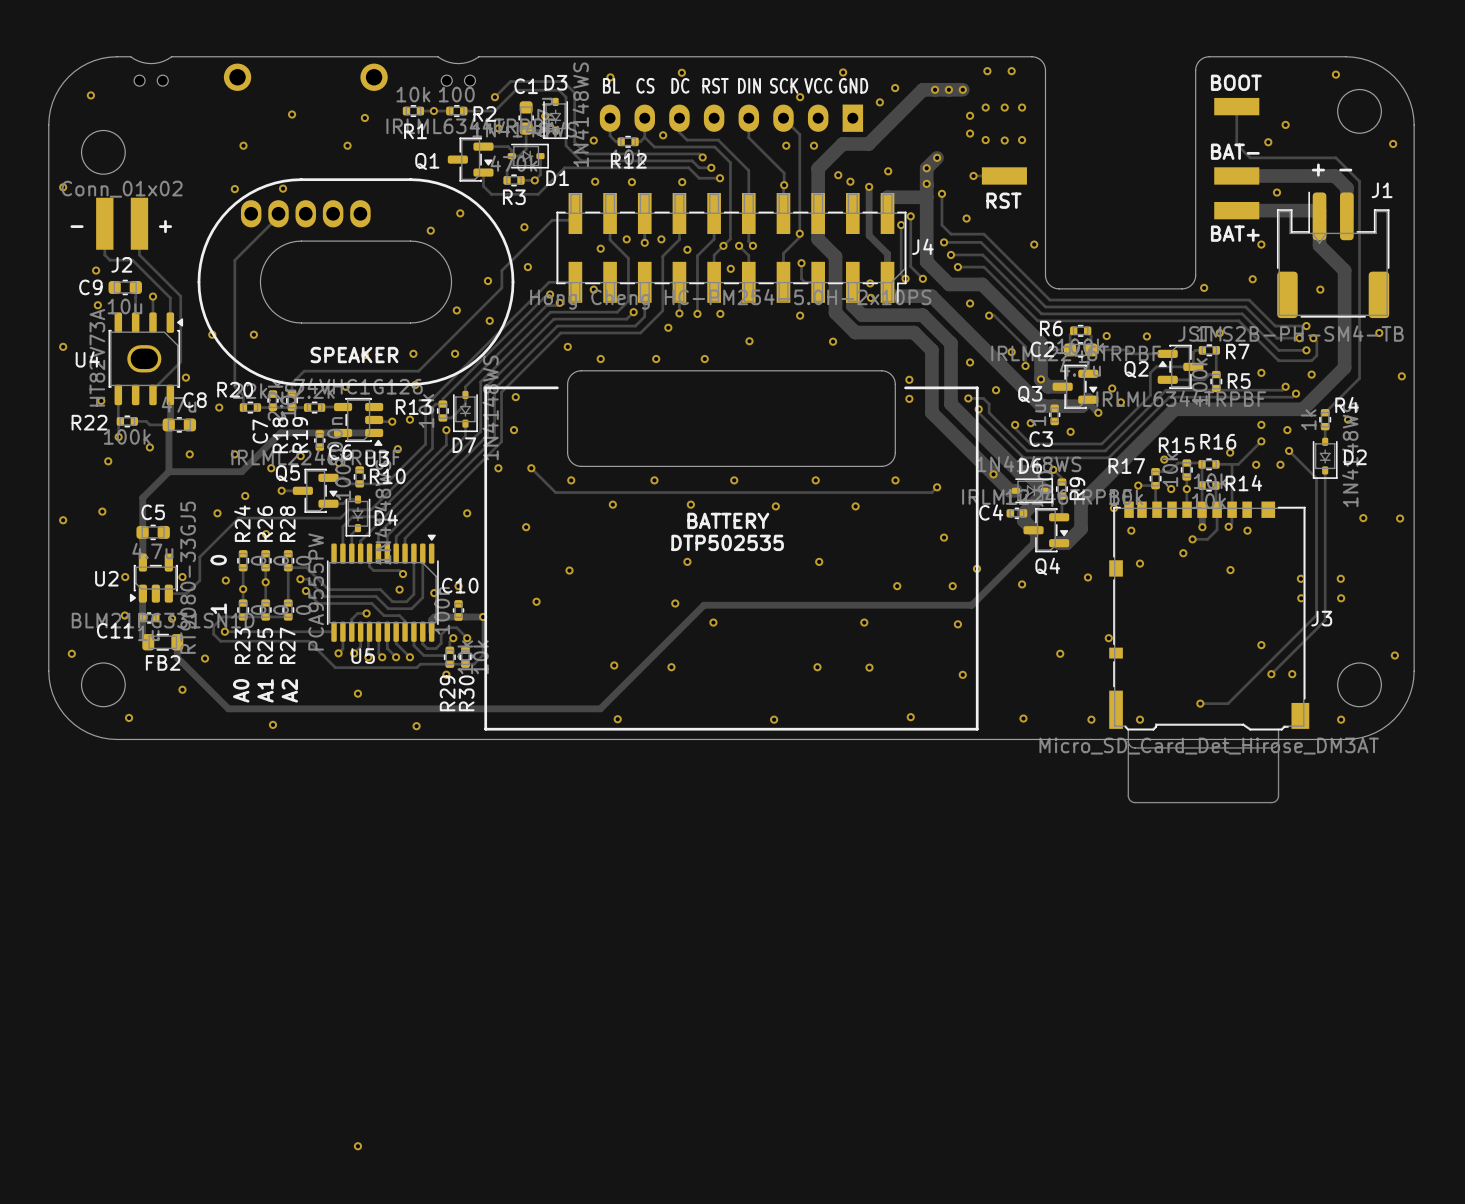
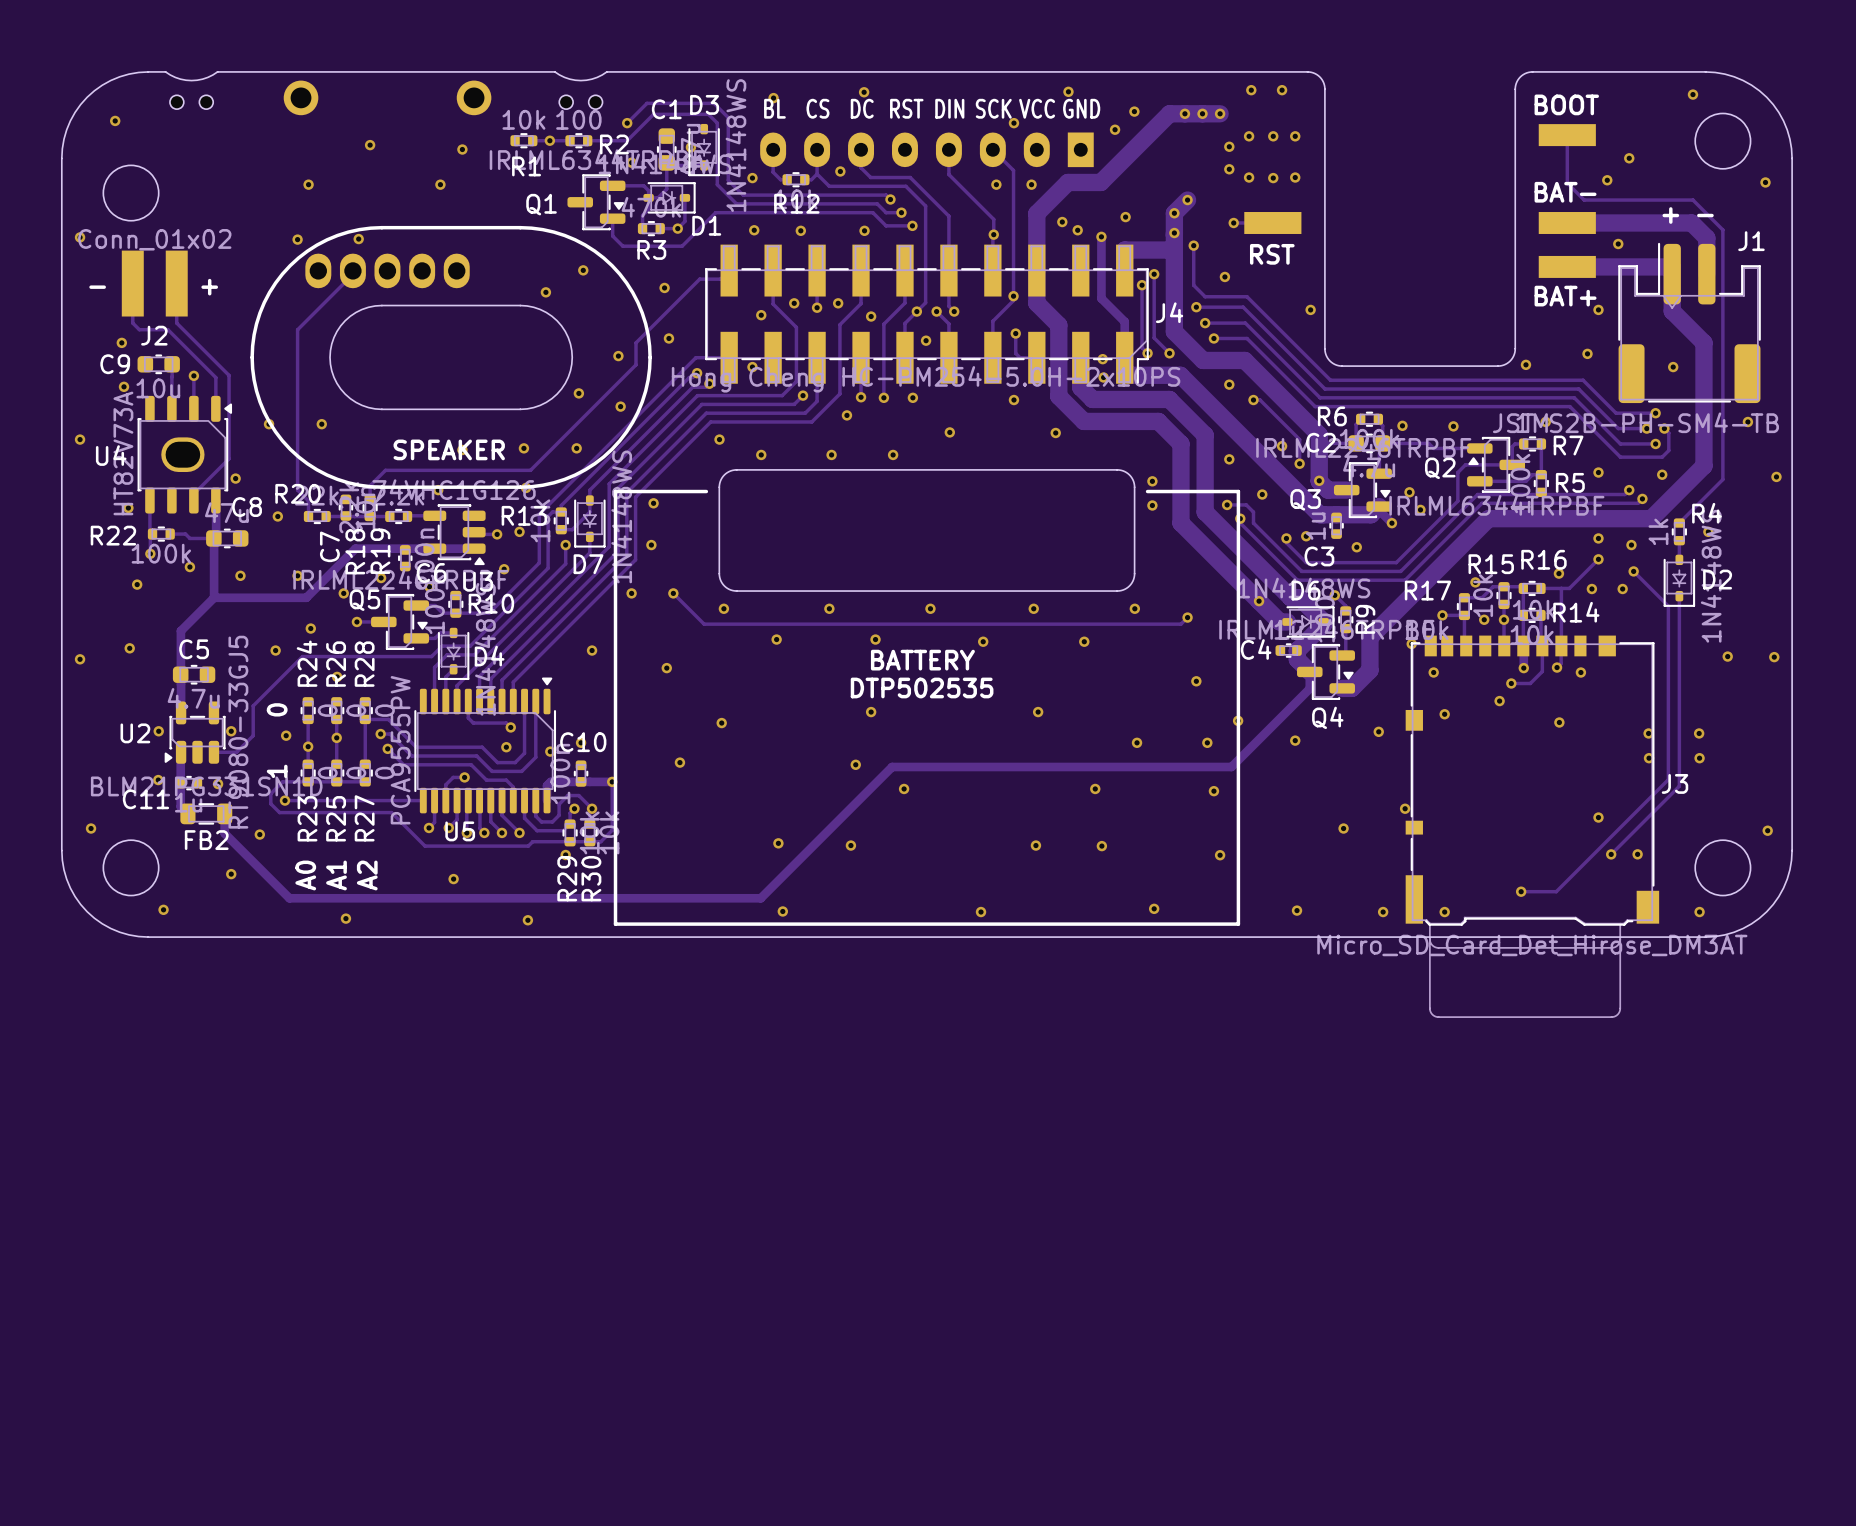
via: (357, 1146) -> none

